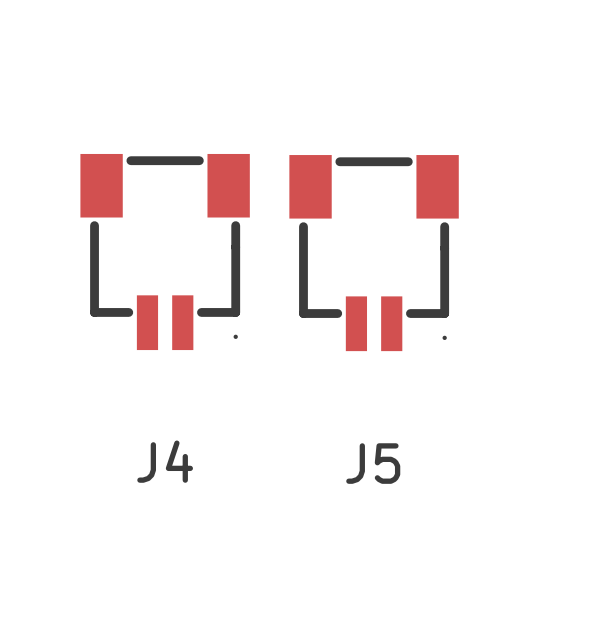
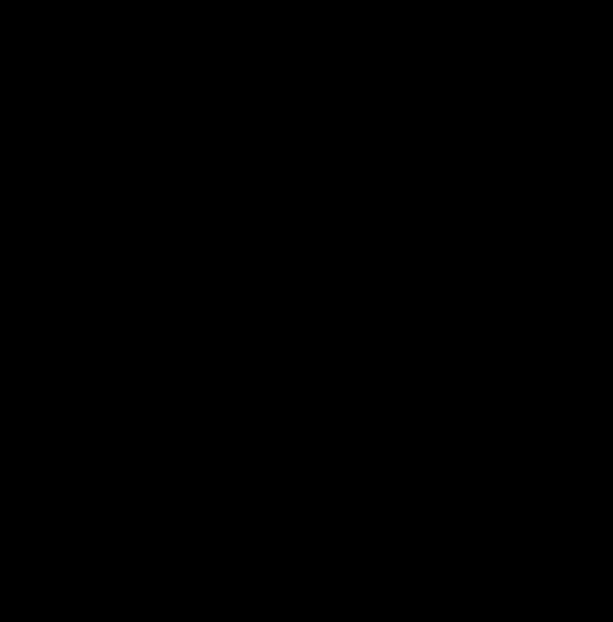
J4: (165, 252) -> none
J5: (374, 253) -> none

